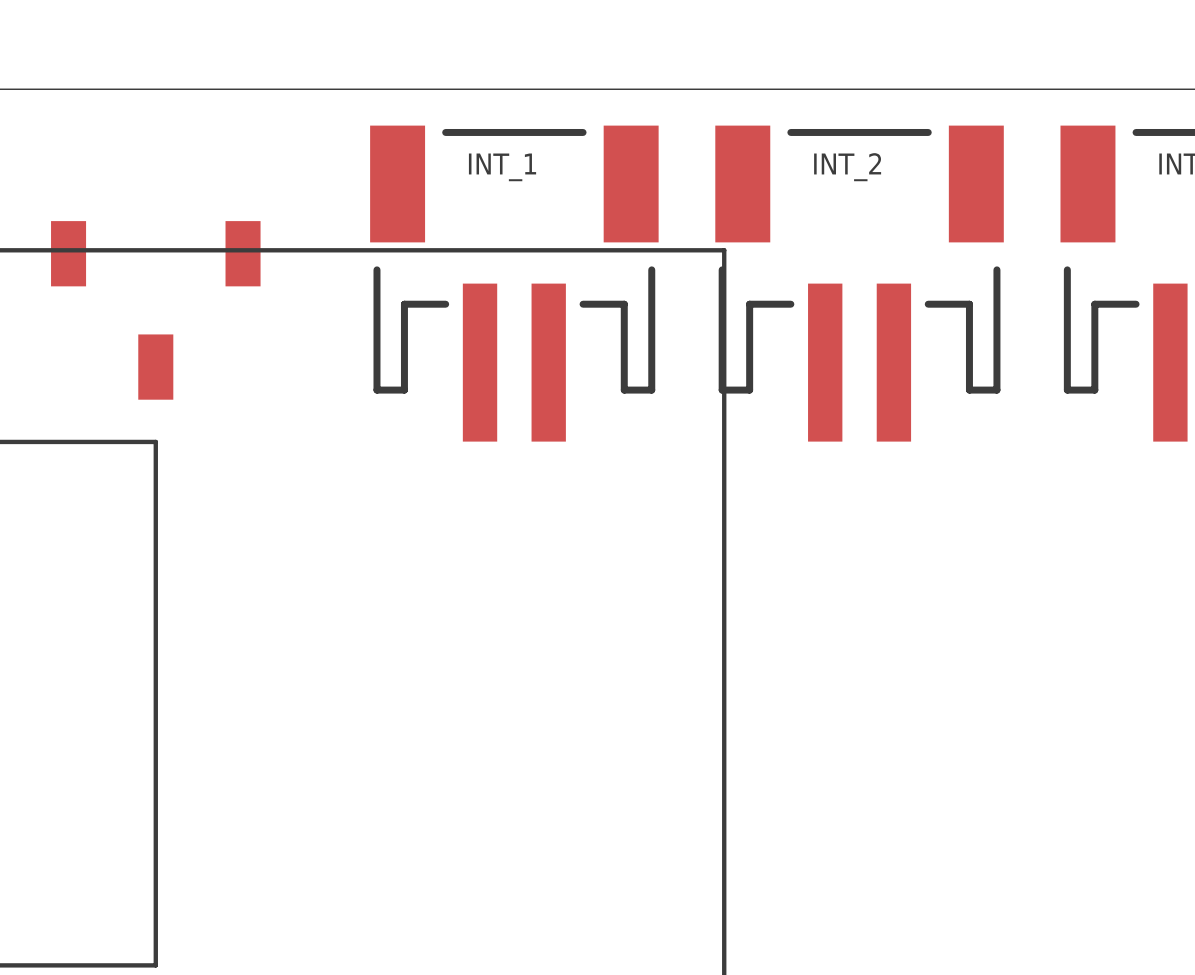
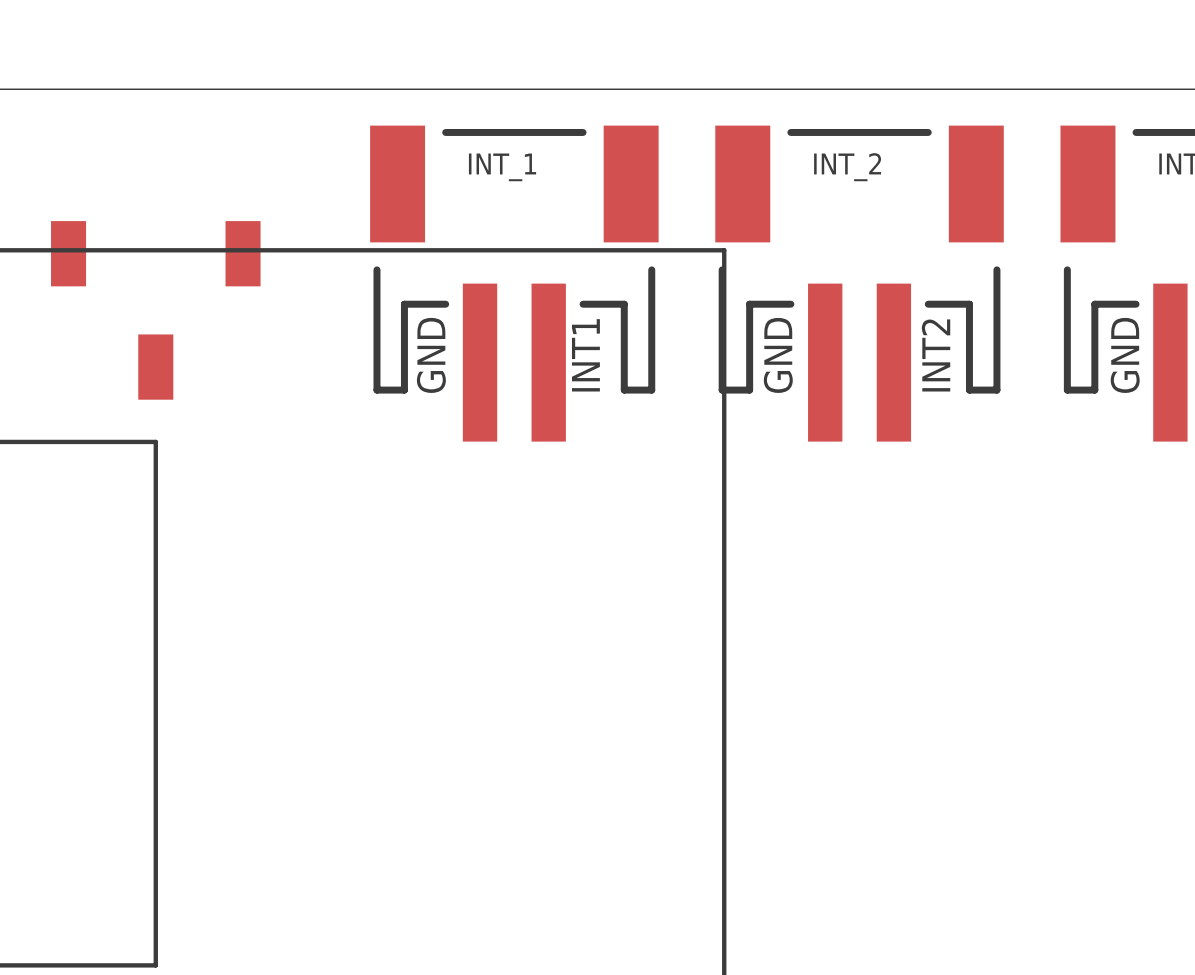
text: none -> GND (431, 355)
text: none -> INT1 (585, 355)
text: none -> GND (778, 355)
text: none -> INT2 (936, 355)
text: none -> GND (1125, 355)

